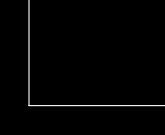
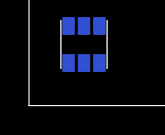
part: none -> (83, 44)

